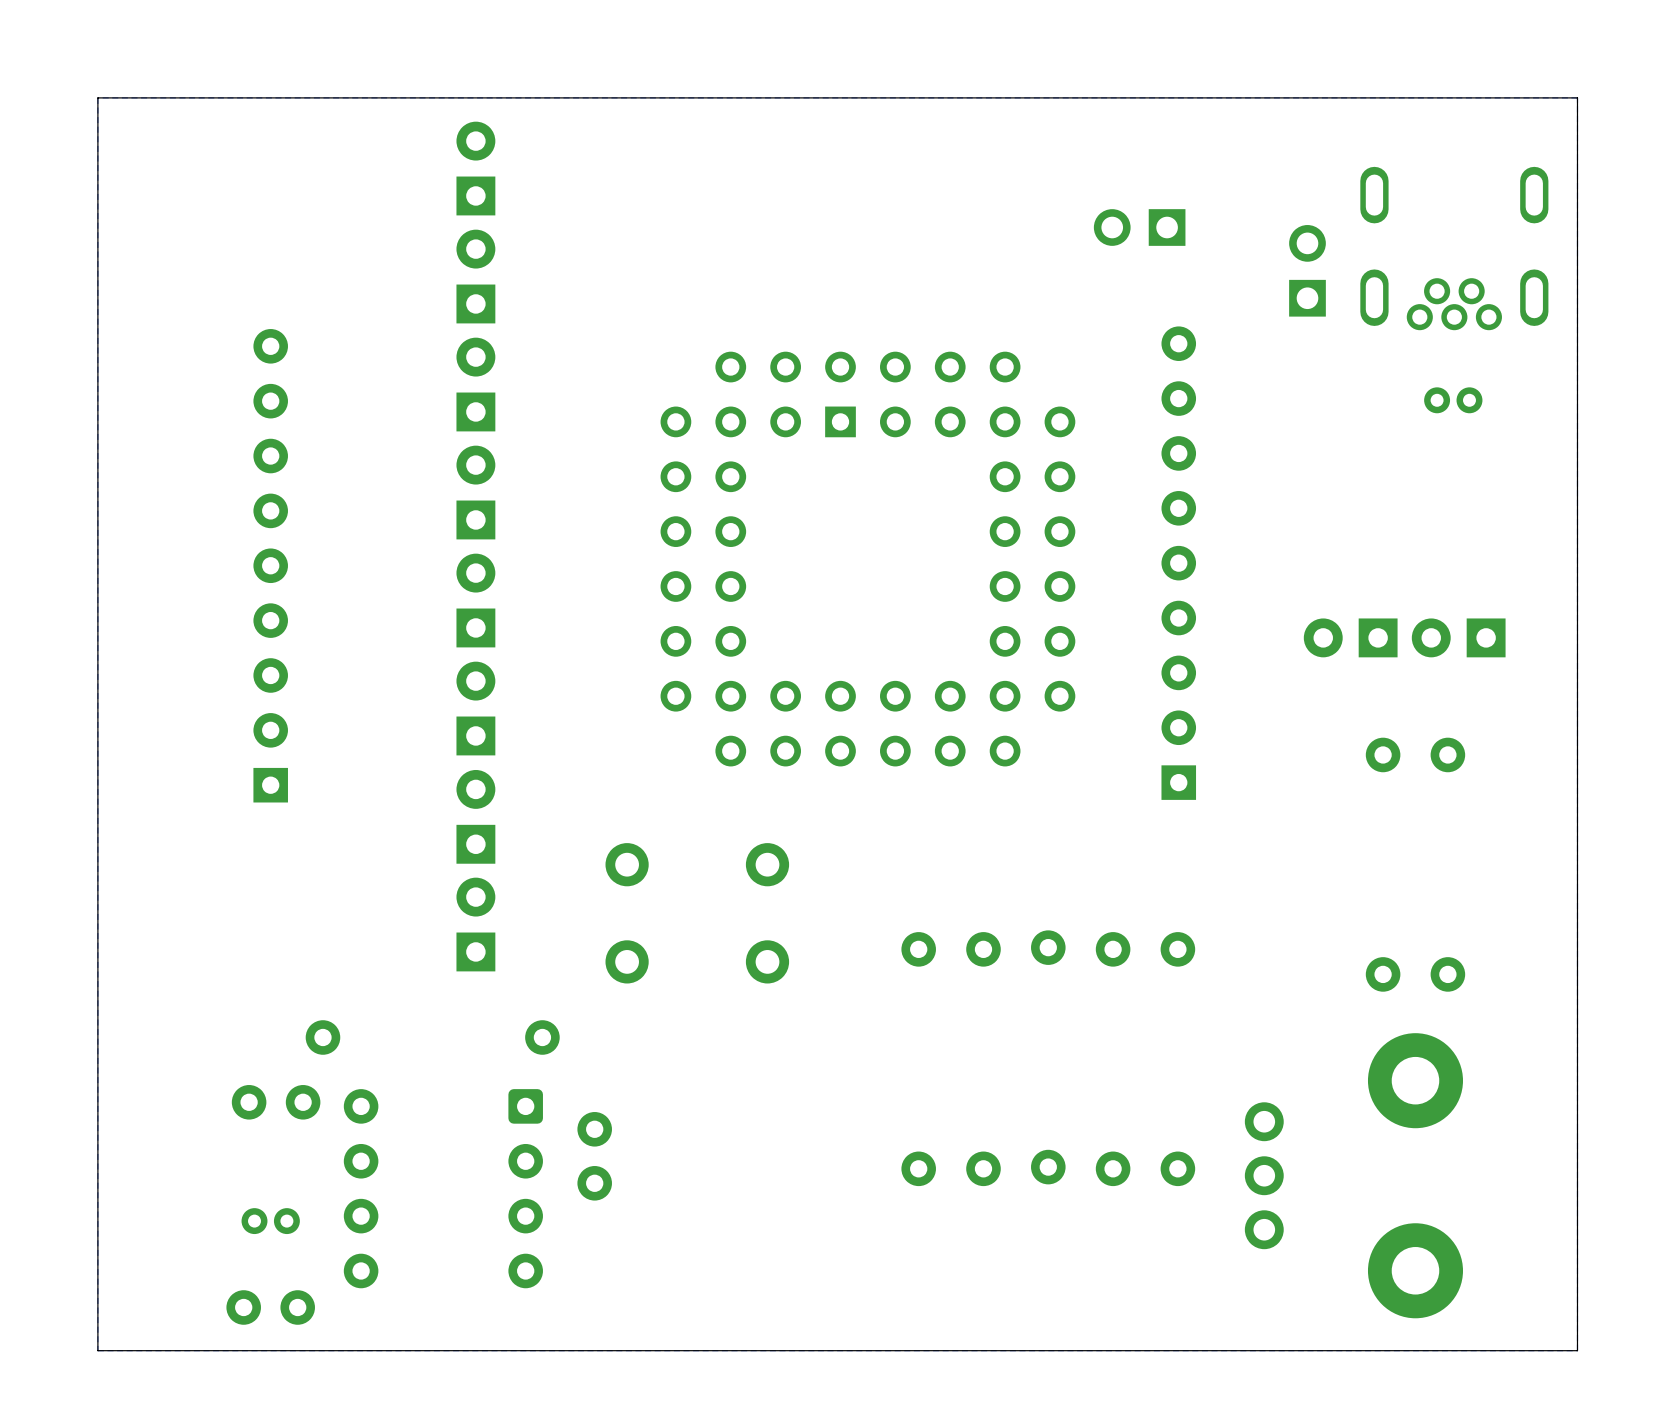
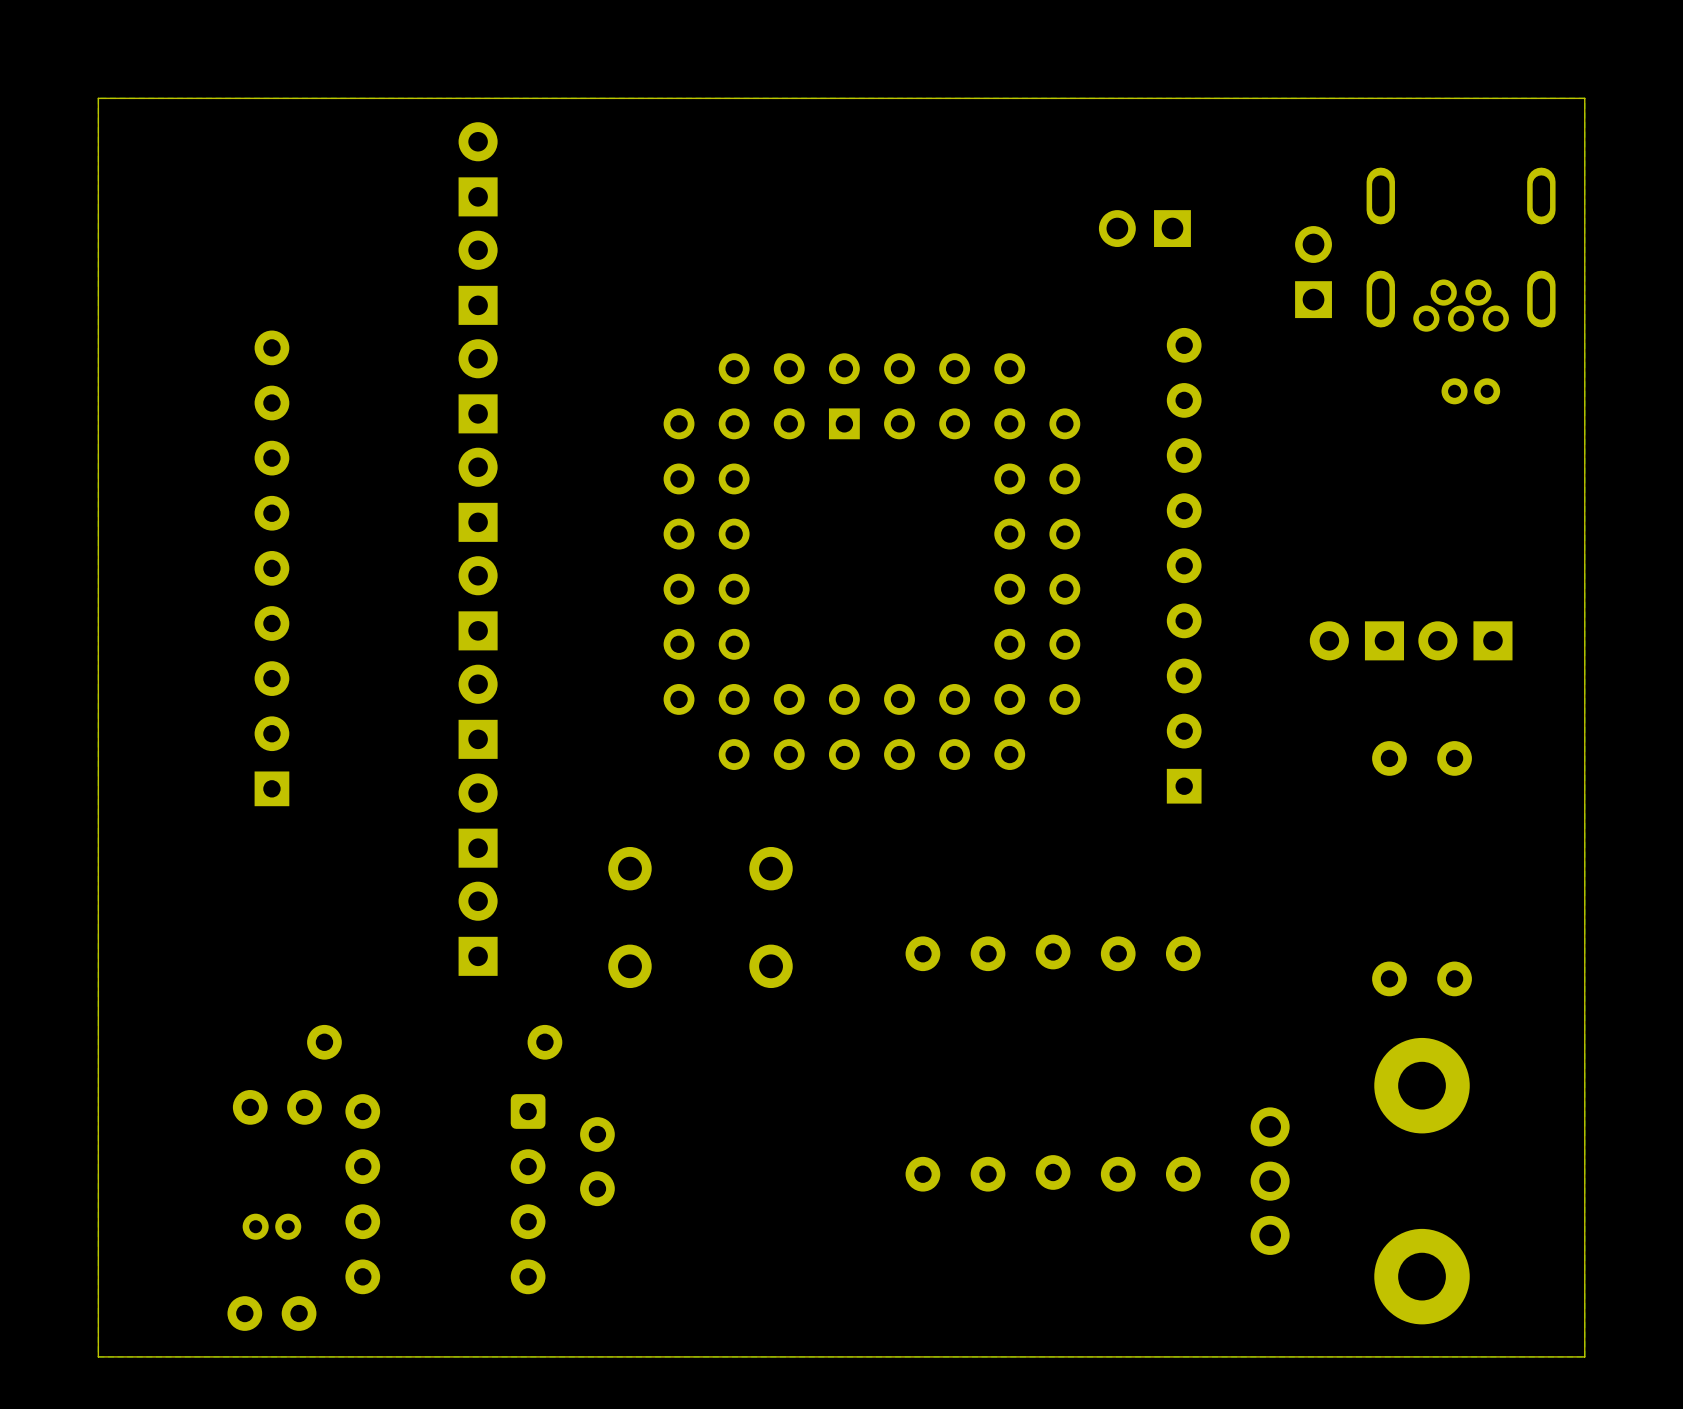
part position: (1453, 400) -> (1470, 391)

